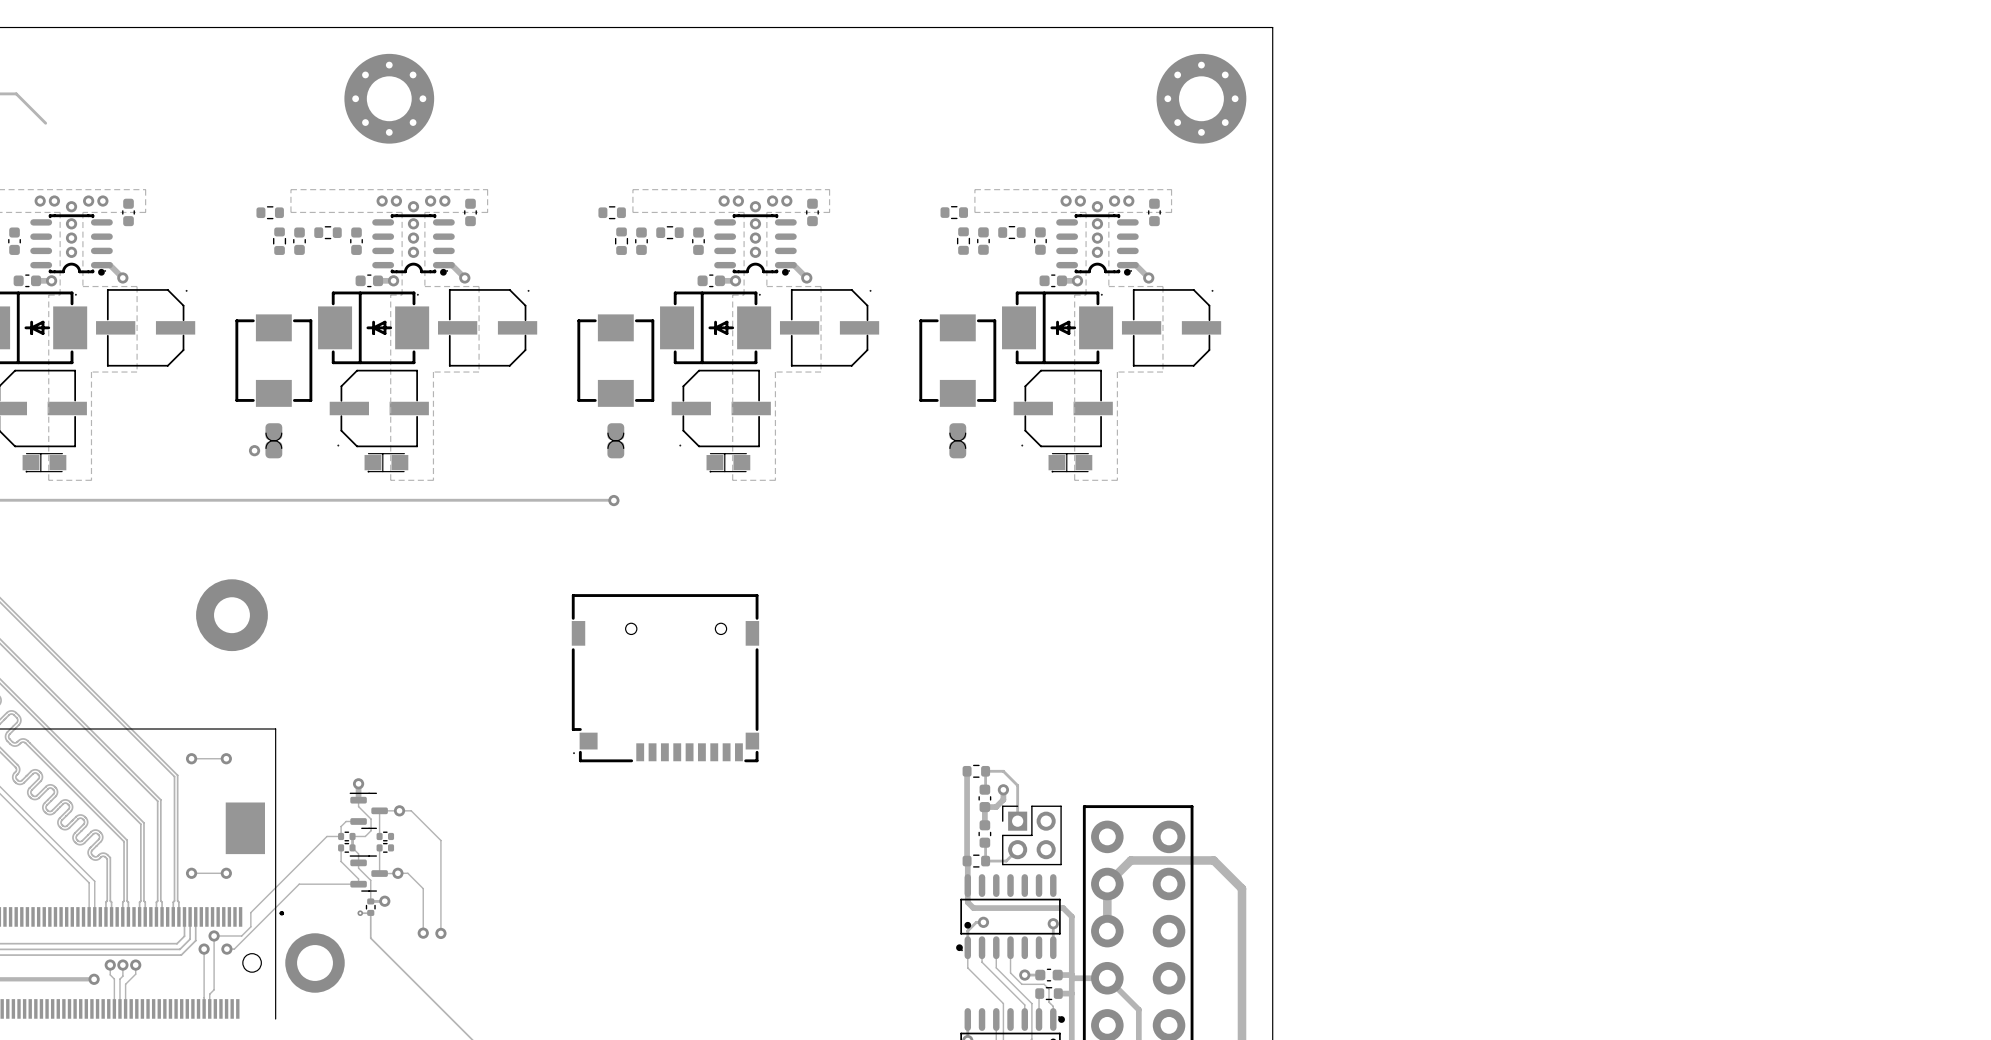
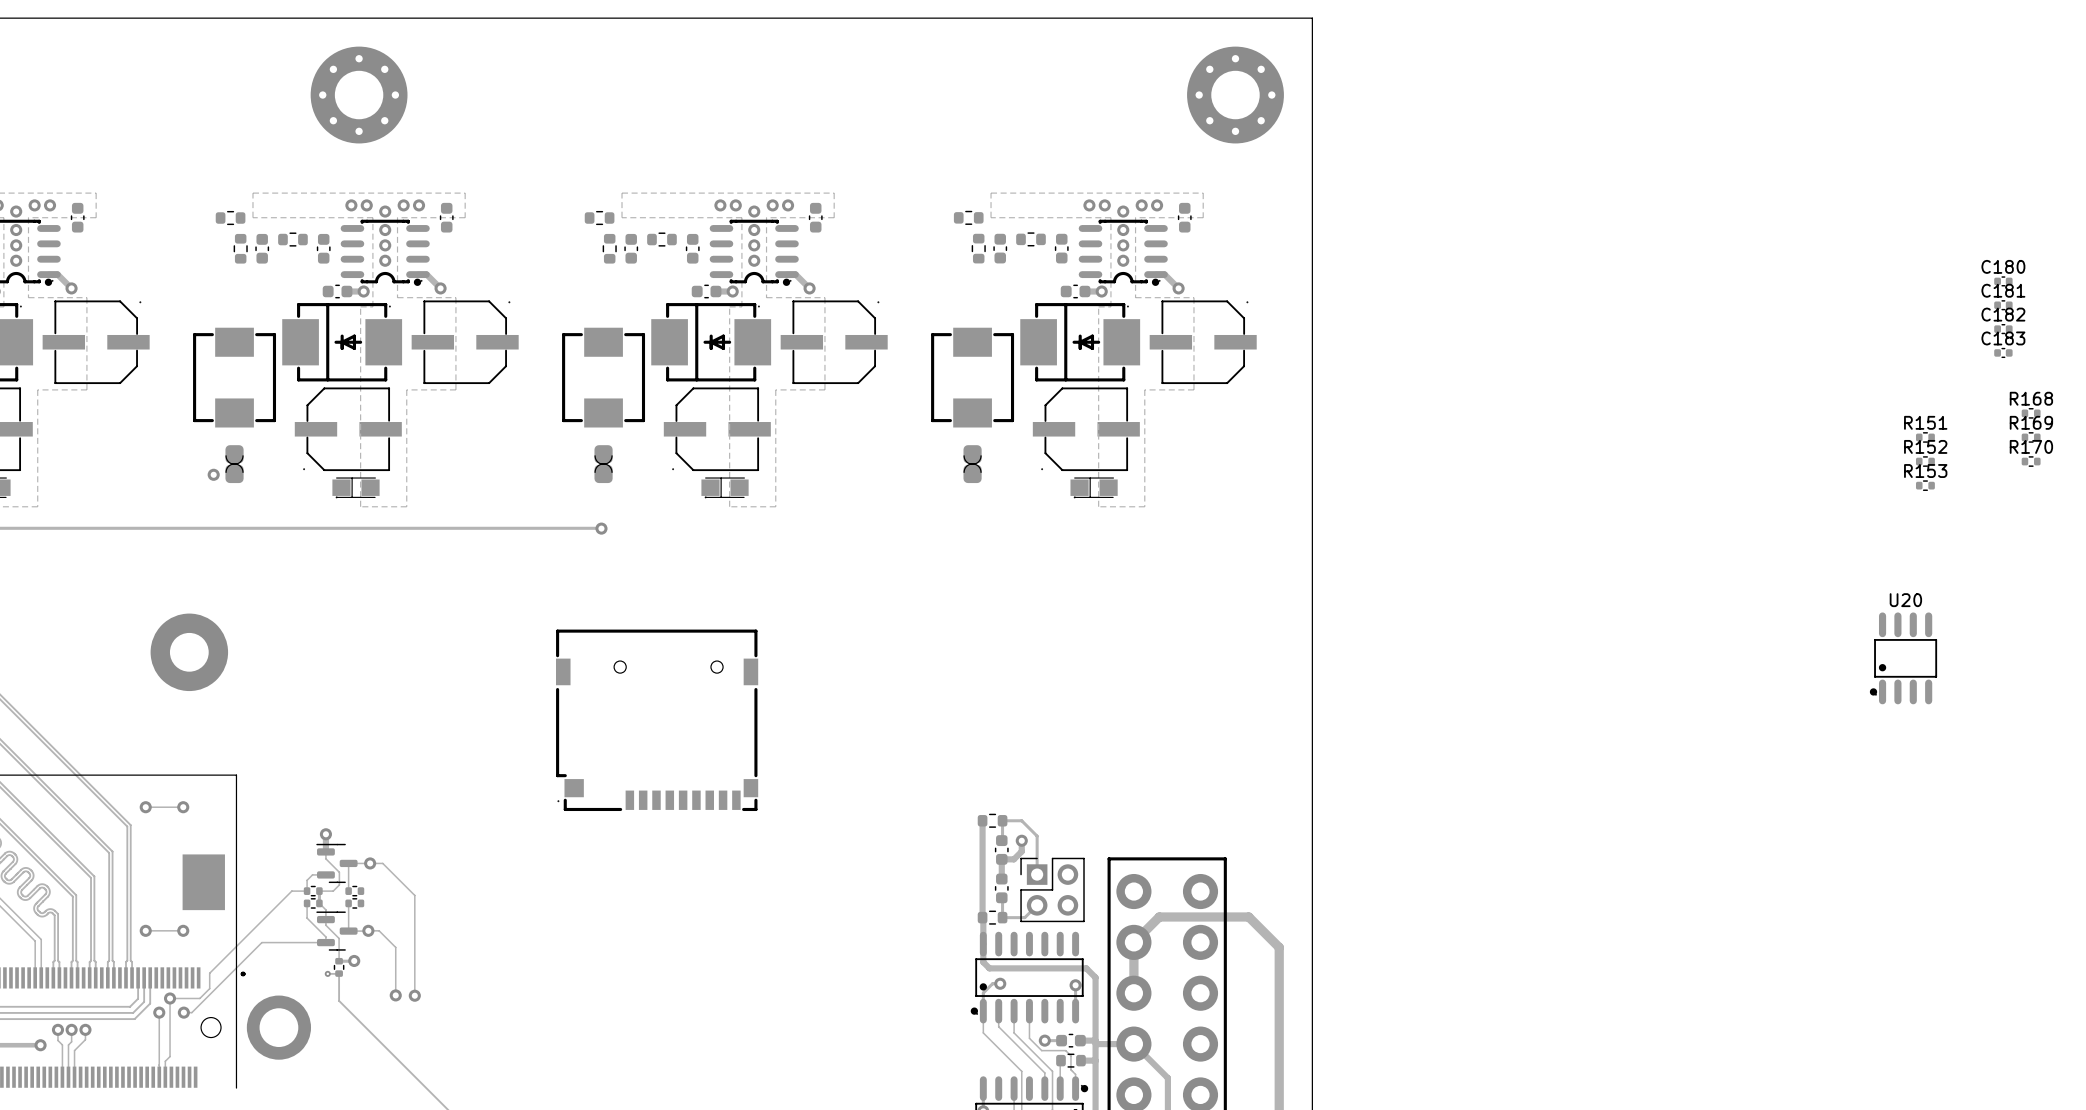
C180: none -> (2003, 281)
C181: none -> (2003, 305)
C182: none -> (2003, 329)
C183: none -> (2003, 352)
R168: none -> (2031, 413)
R151: none -> (1925, 437)
R169: none -> (2031, 437)
R152: none -> (1925, 461)
R170: none -> (2031, 461)
R153: none -> (1925, 485)
U20: none -> (1903, 658)

